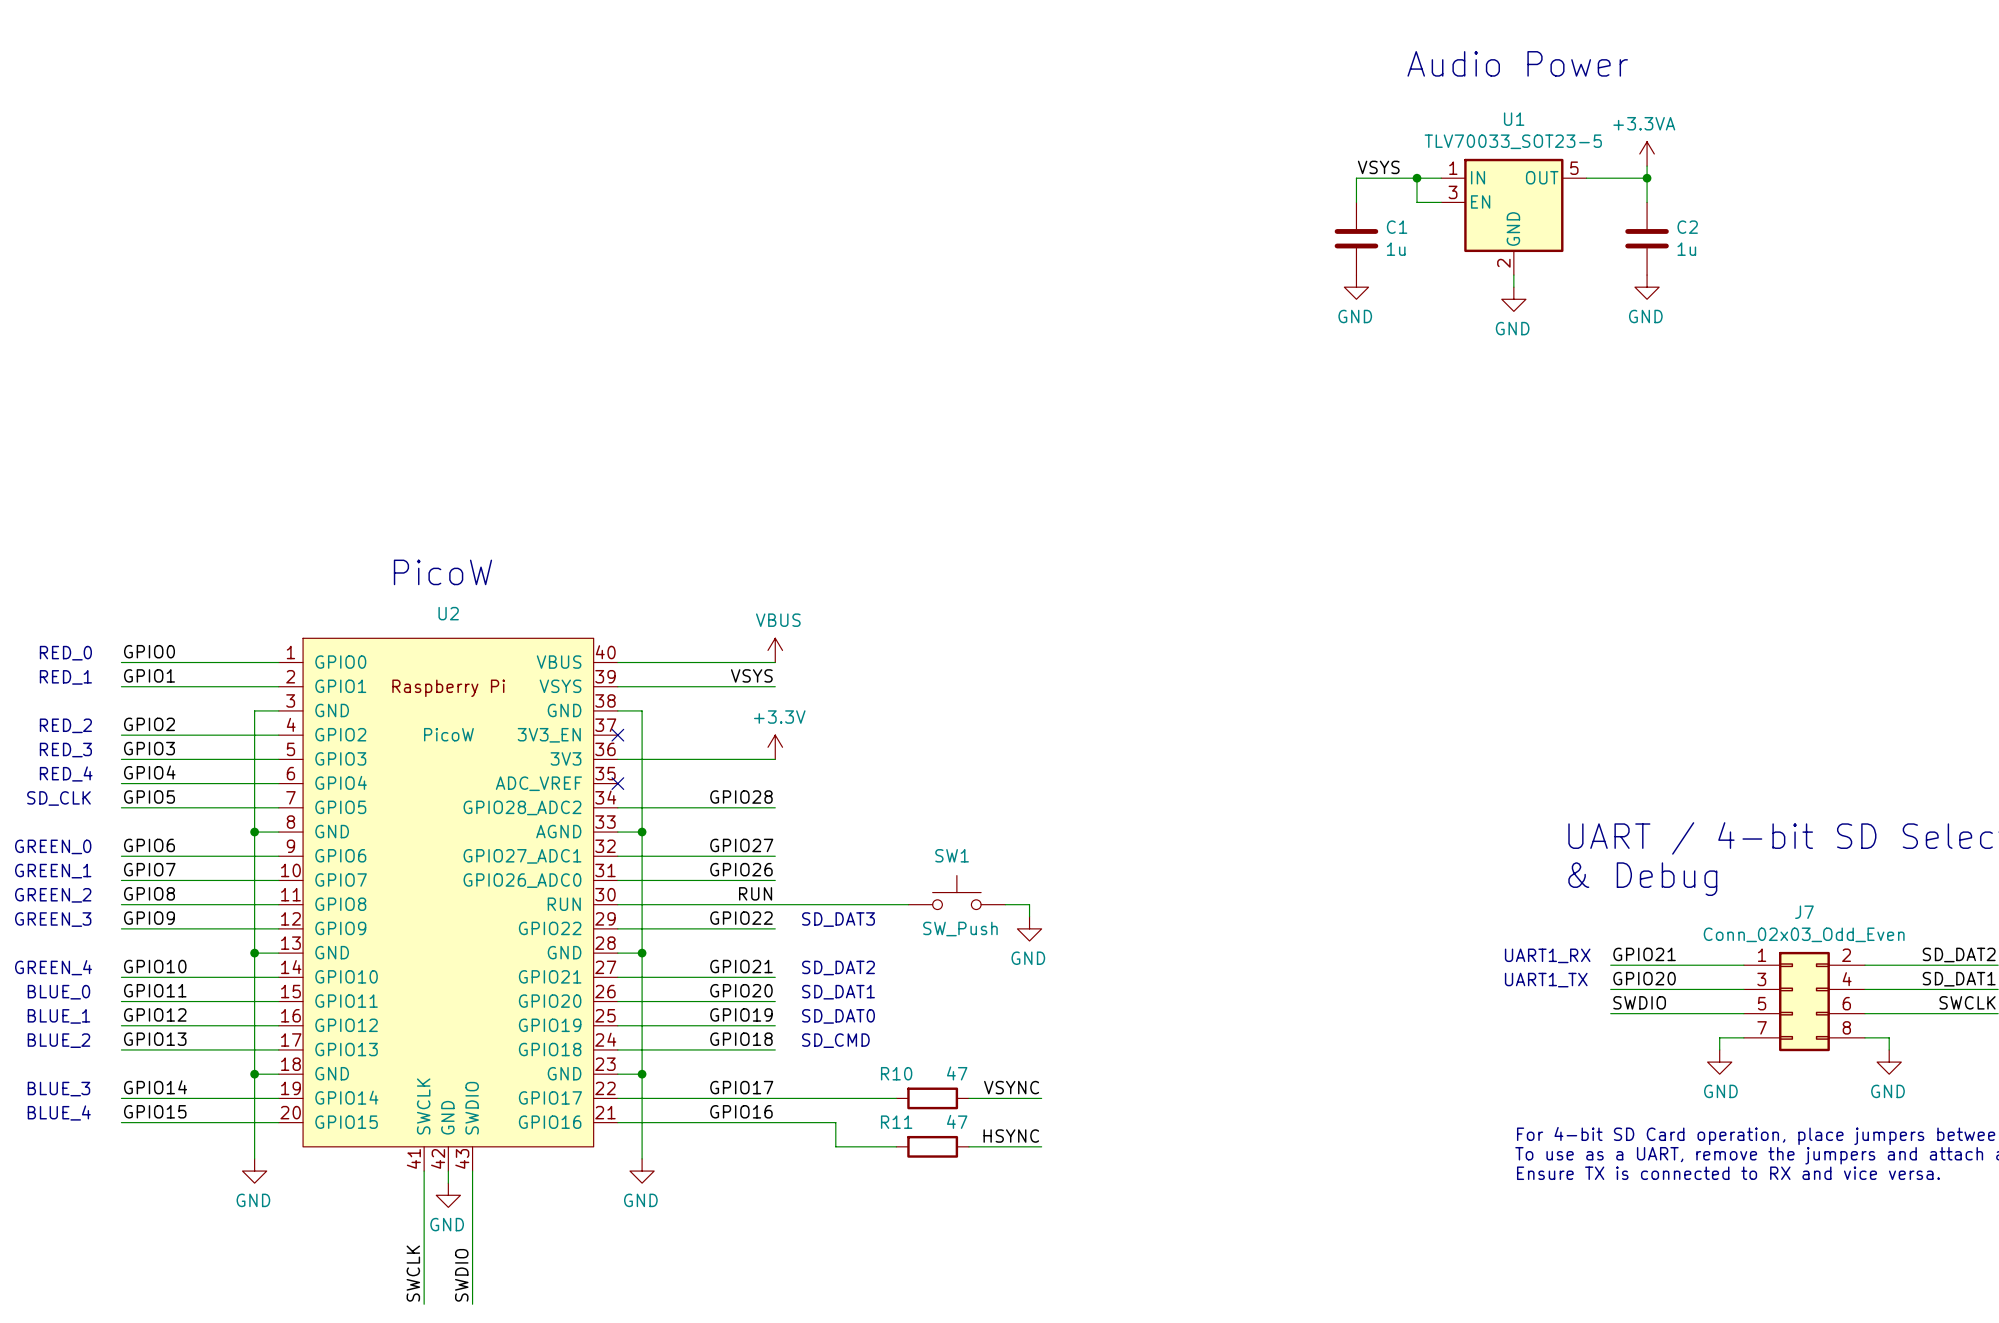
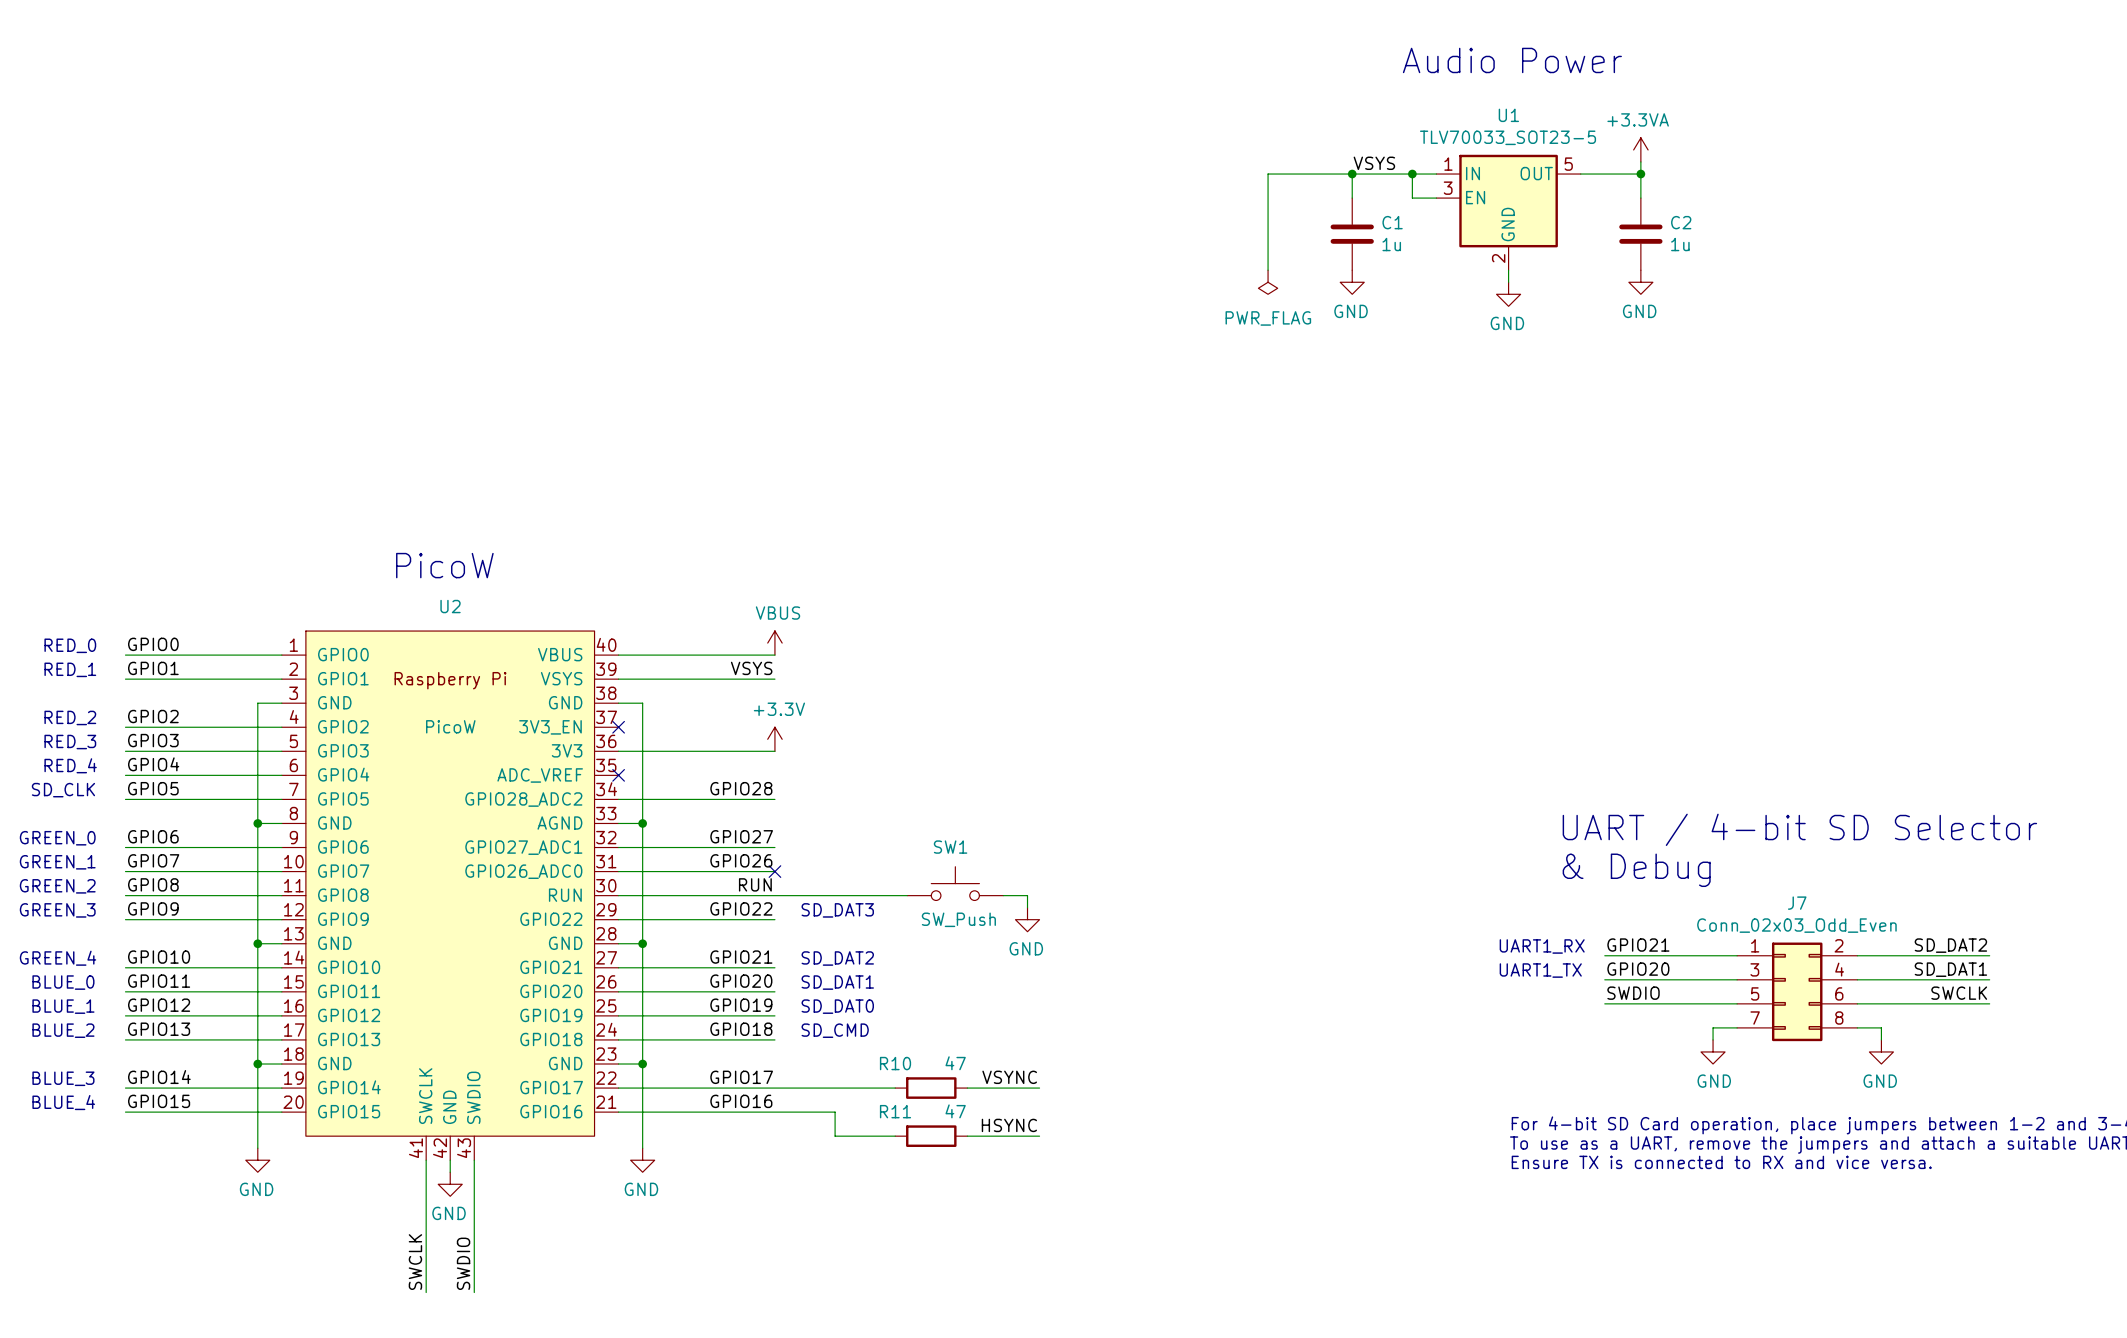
wire: none -> (1352, 174) (1268, 174) (1268, 270)
junction: none -> (1352, 174)
power symbol: none -> PWR_FLAG (1268, 282)
no-connect mark: none -> (774, 871)

